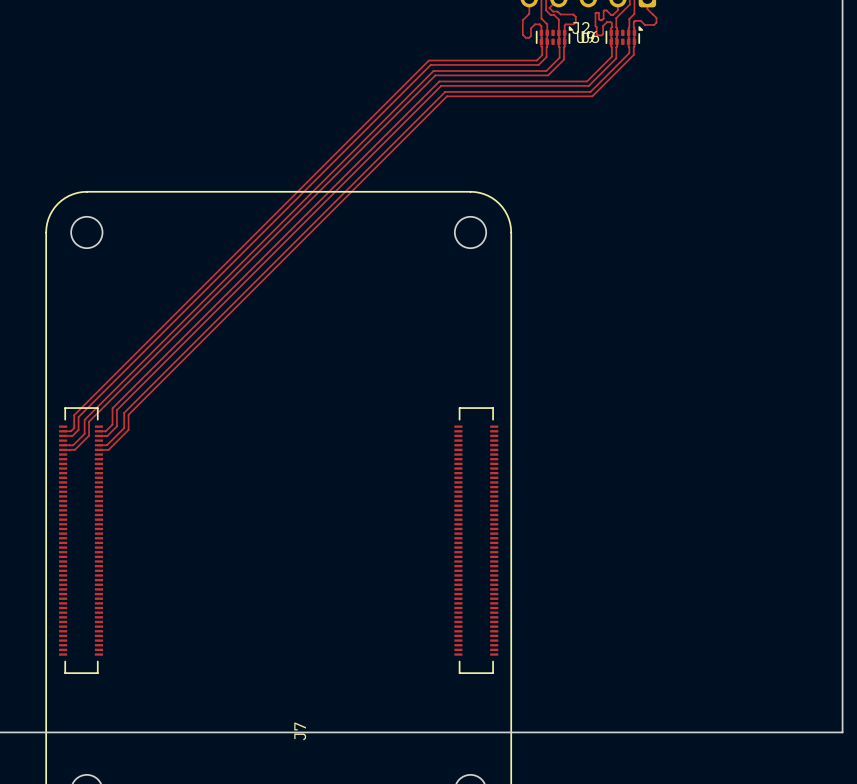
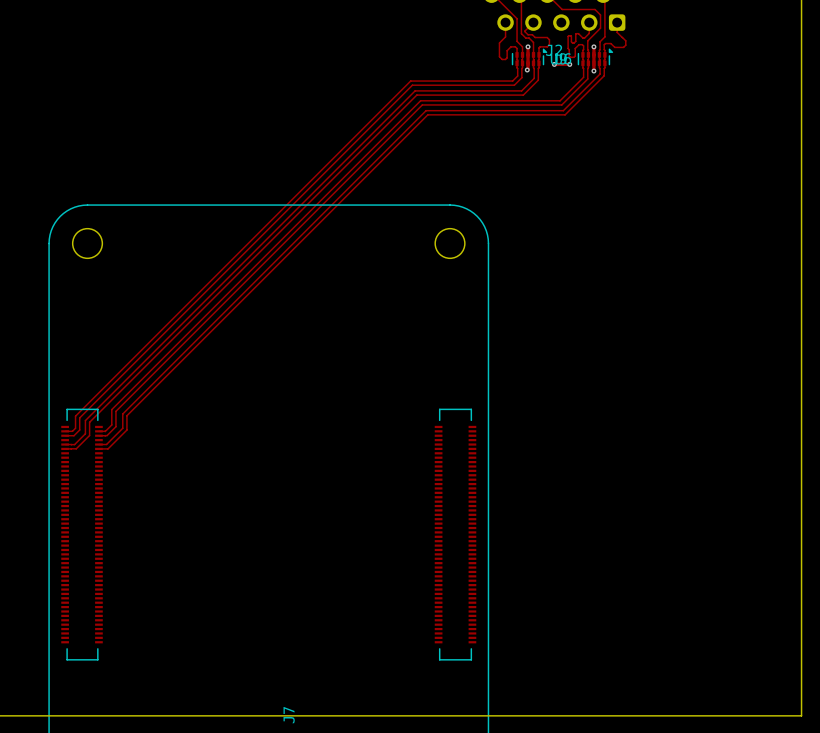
track: none -> (528, 46) (527, 70)
via: none -> (528, 46)
track: none -> (593, 46) (593, 71)
via: none -> (593, 46)
track: none -> (554, 64) (569, 64)
via: none -> (554, 64)
via: none -> (569, 64)
via: none -> (527, 70)
via: none -> (593, 71)

